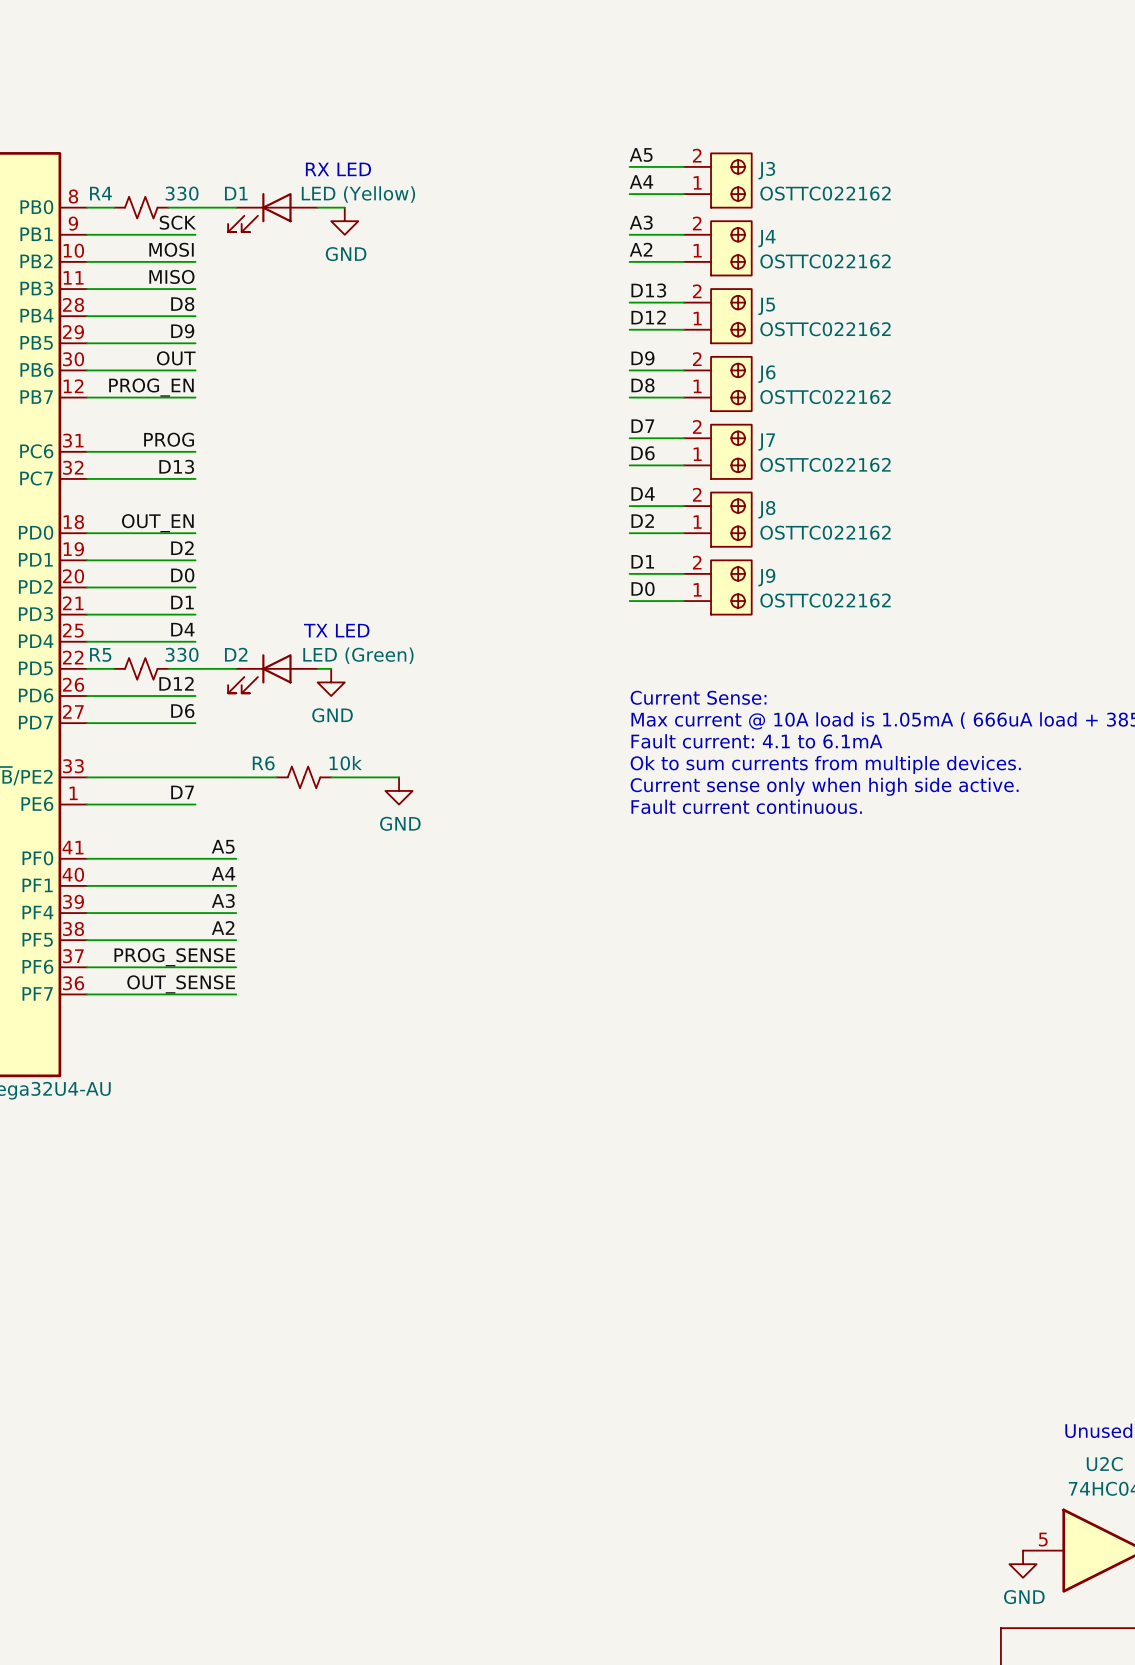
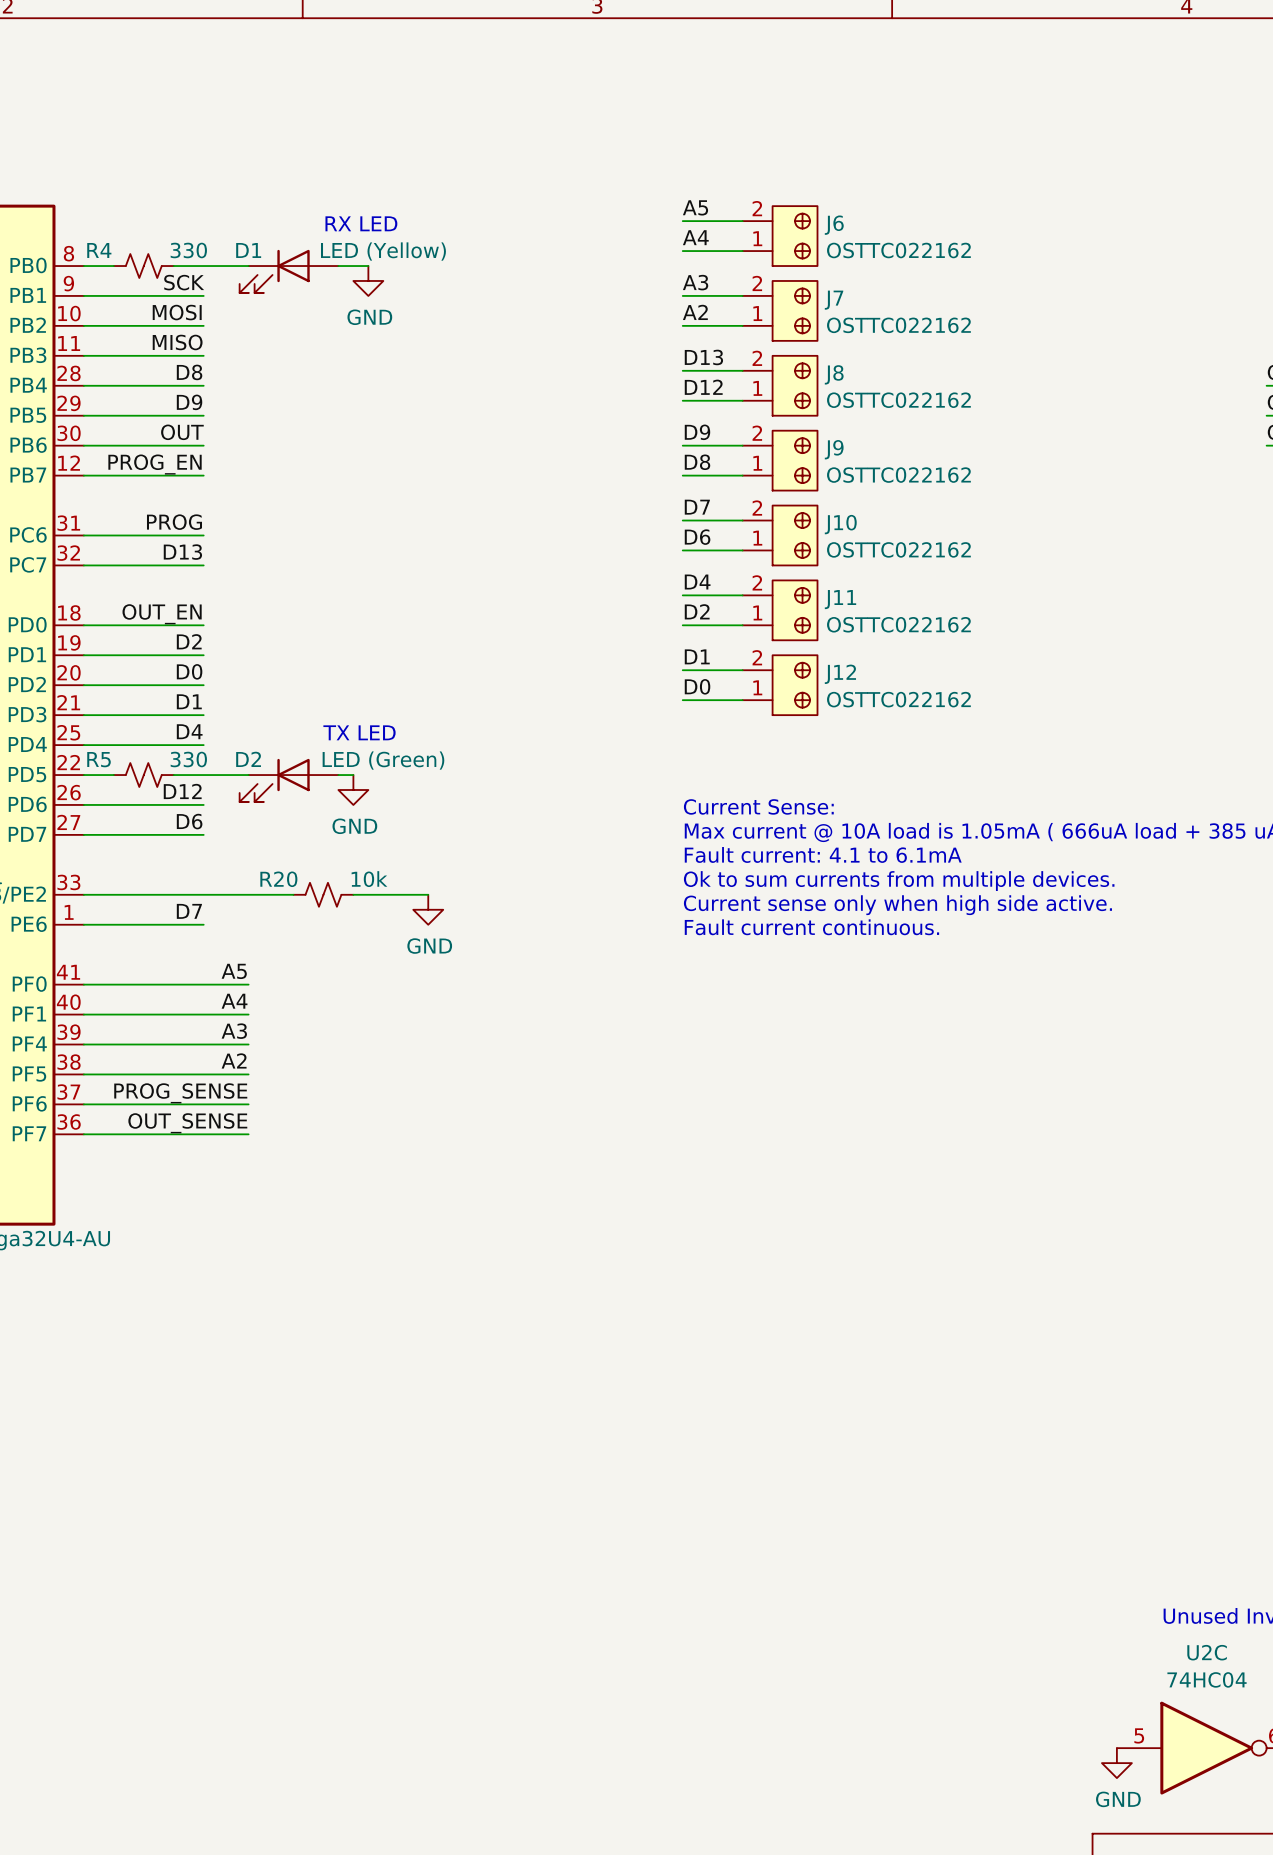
J3 name: J3 (766, 170) -> J6 (834, 225)
J4 name: J4 (766, 238) -> J7 (834, 300)
J5 name: J5 (766, 306) -> J8 (834, 374)
J6 name: J6 (766, 374) -> J9 (834, 449)
J7 name: J7 (766, 442) -> J10 (840, 524)
J8 name: J8 (766, 509) -> J11 (840, 599)
J9 name: J9 (766, 577) -> J12 (840, 674)
R6 name: R6 (263, 763) -> R20 (278, 879)

